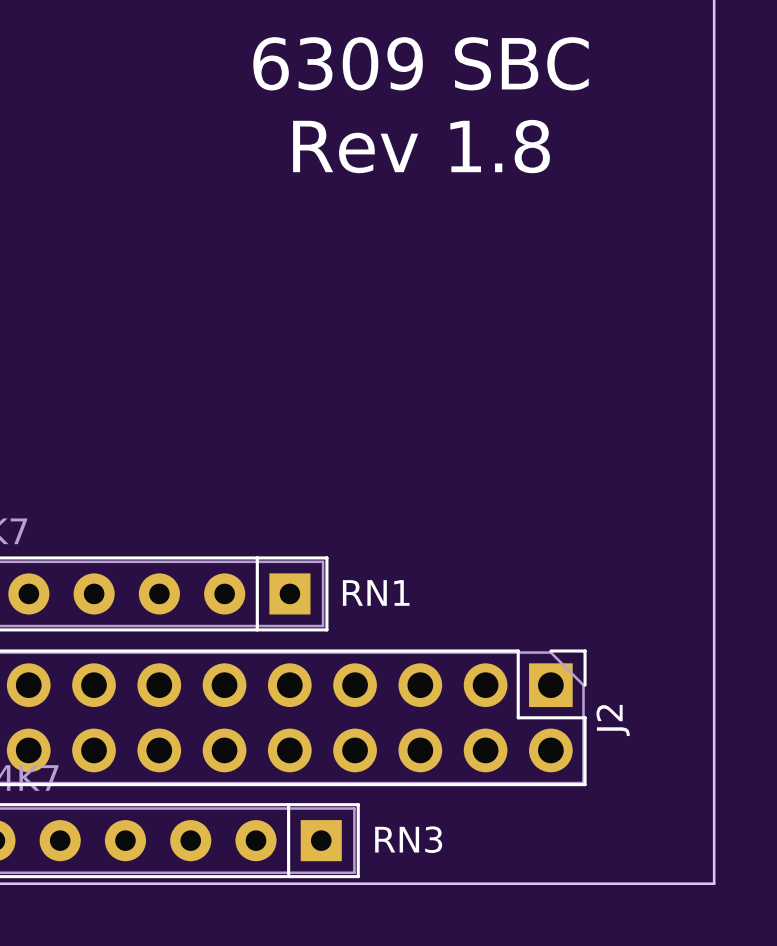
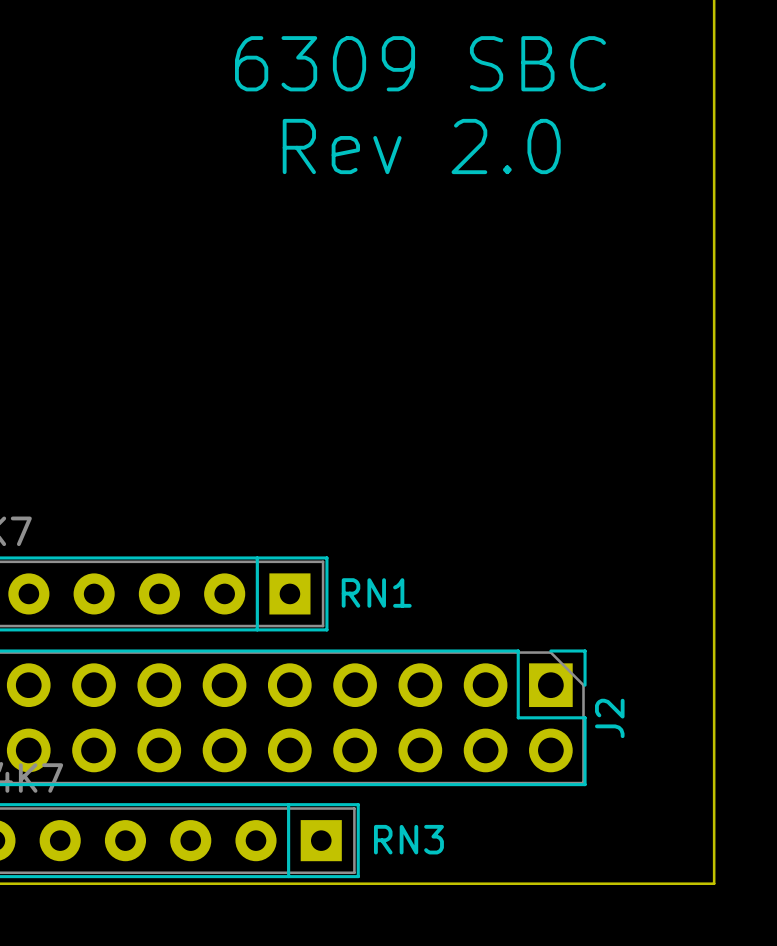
text: Rev 1.8 (421, 146) -> Rev 2.0 (421, 146)

